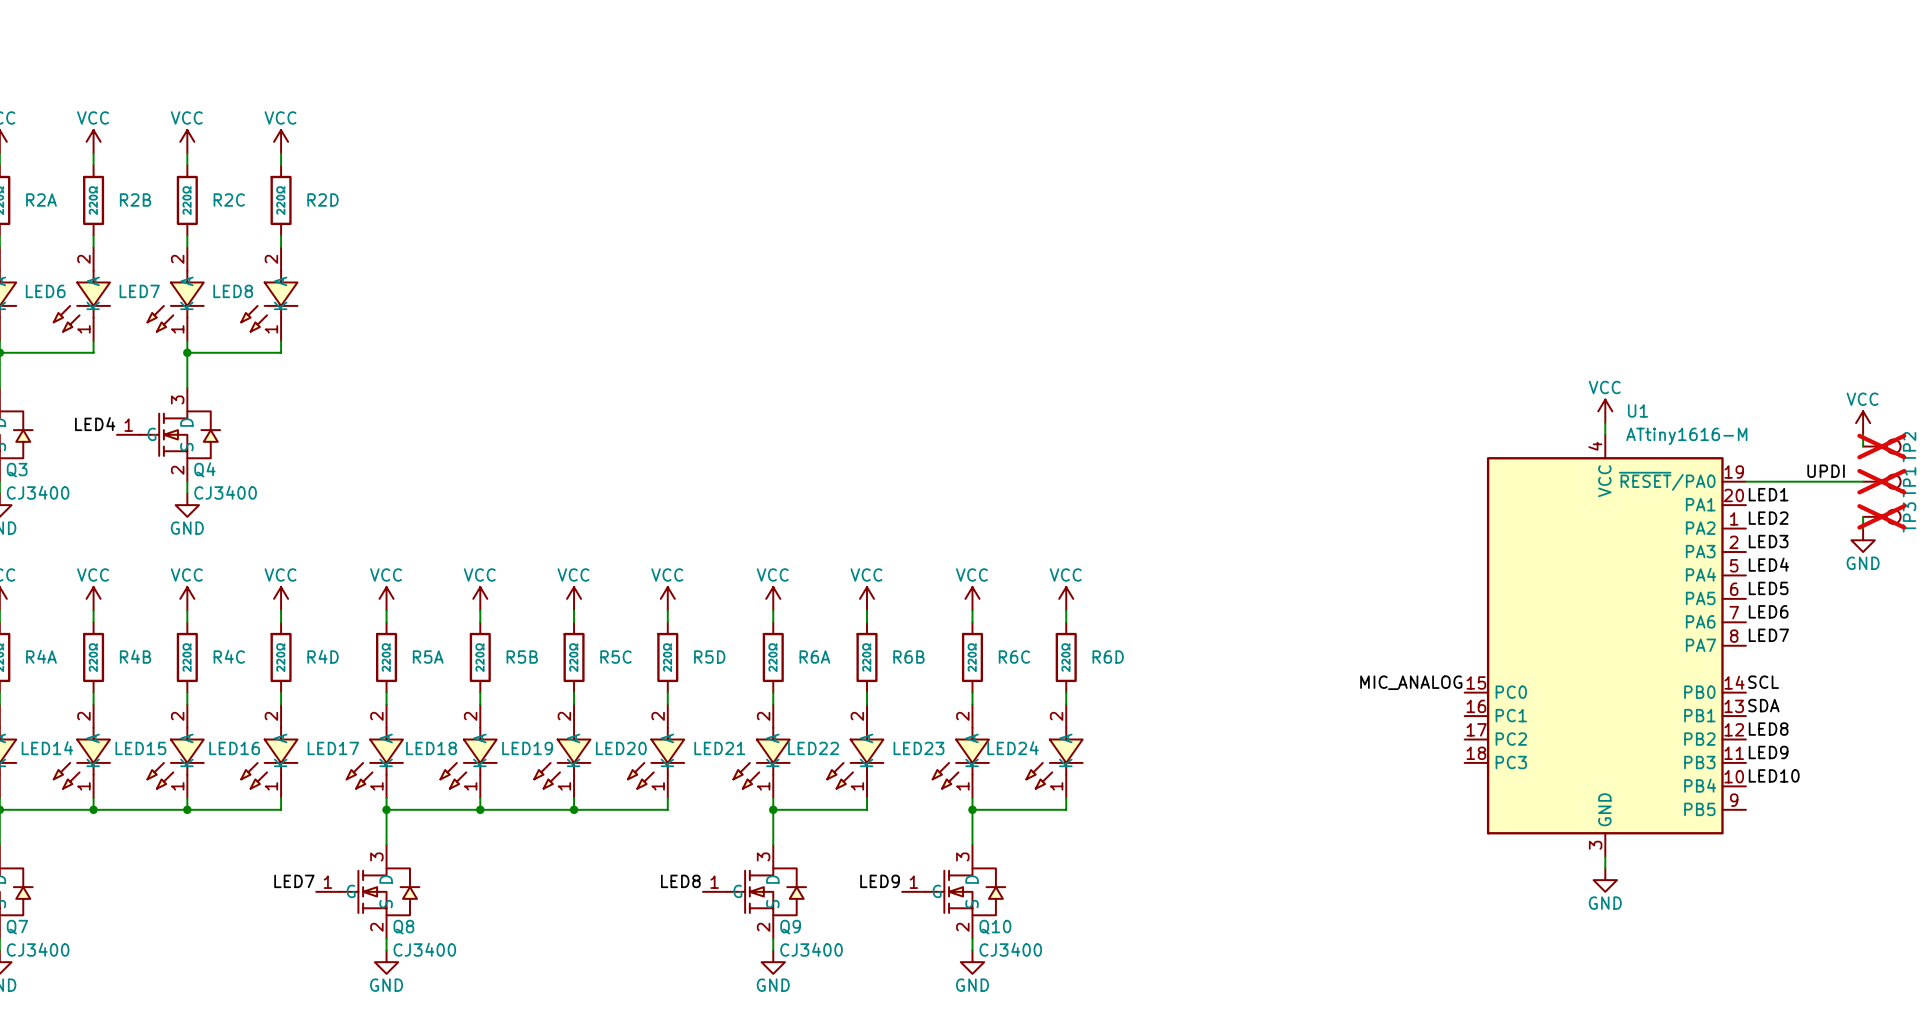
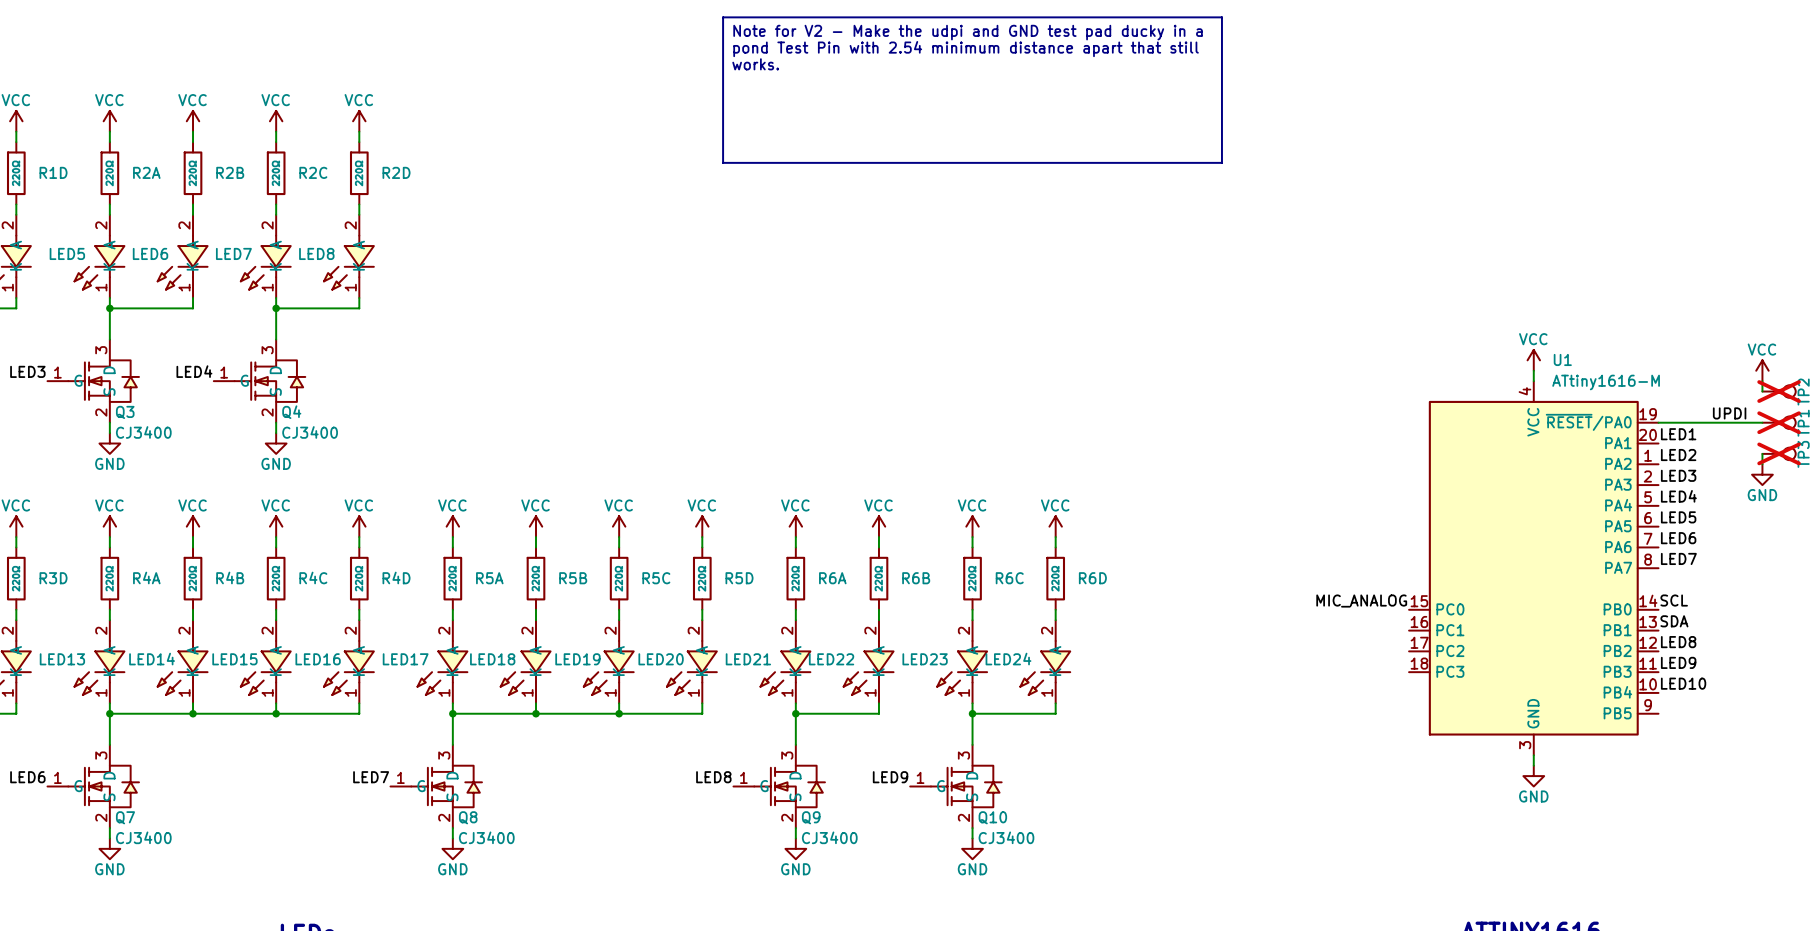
line: none -> (723, 17) (1221, 17) (1221, 162) (723, 162) (723, 17)
text: none -> Note for V2 - Make the udpi and GND test pad ducky in a (968, 32)
text: none -> pond Test Pin with 2.54 minimum distance apart that still (966, 49)
text: none -> works. (755, 64)

